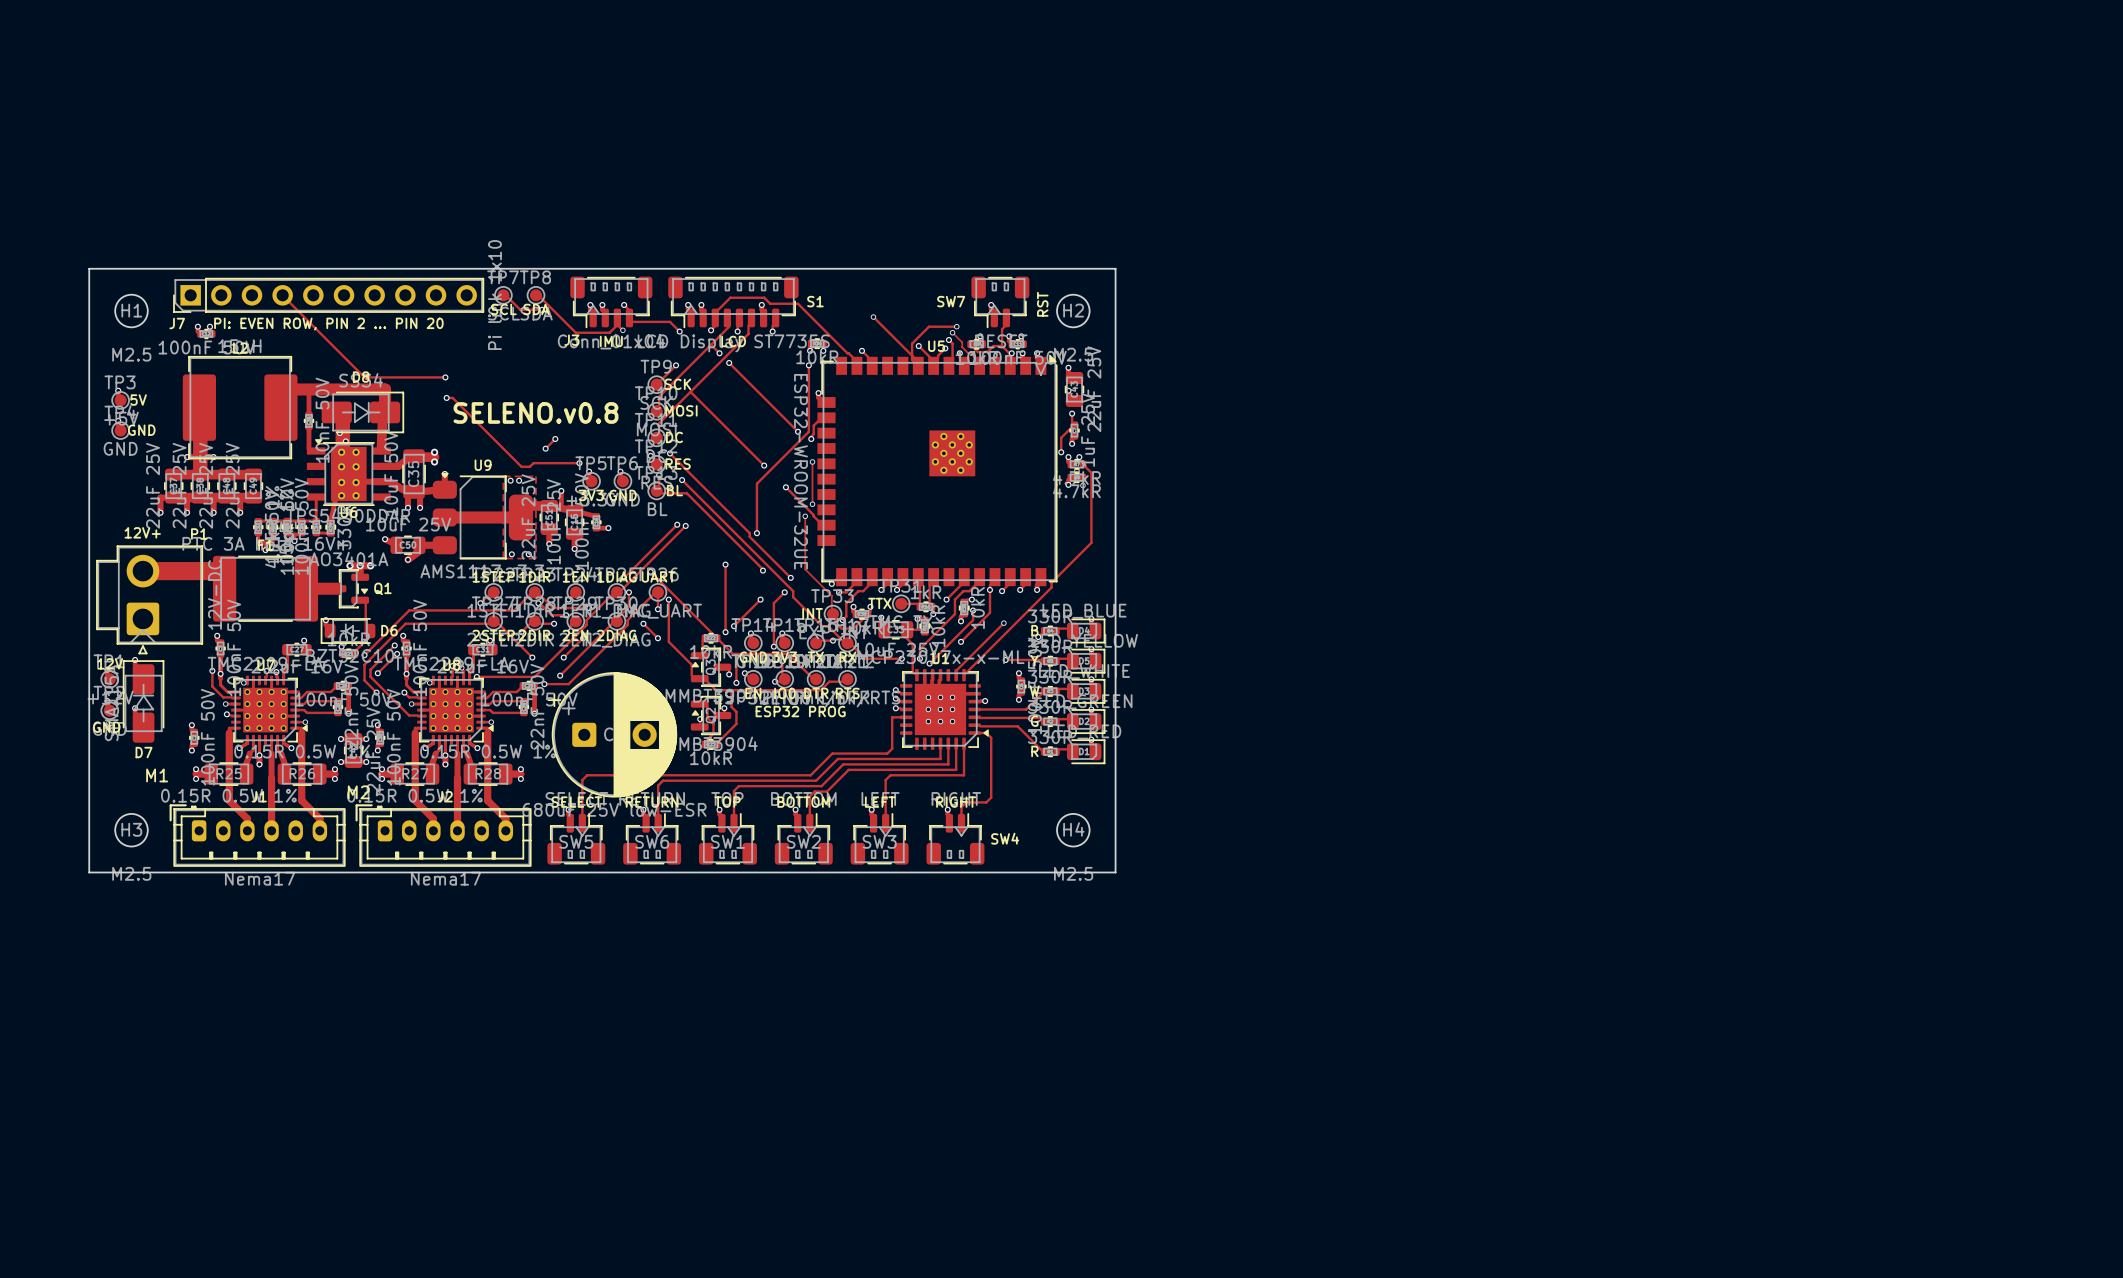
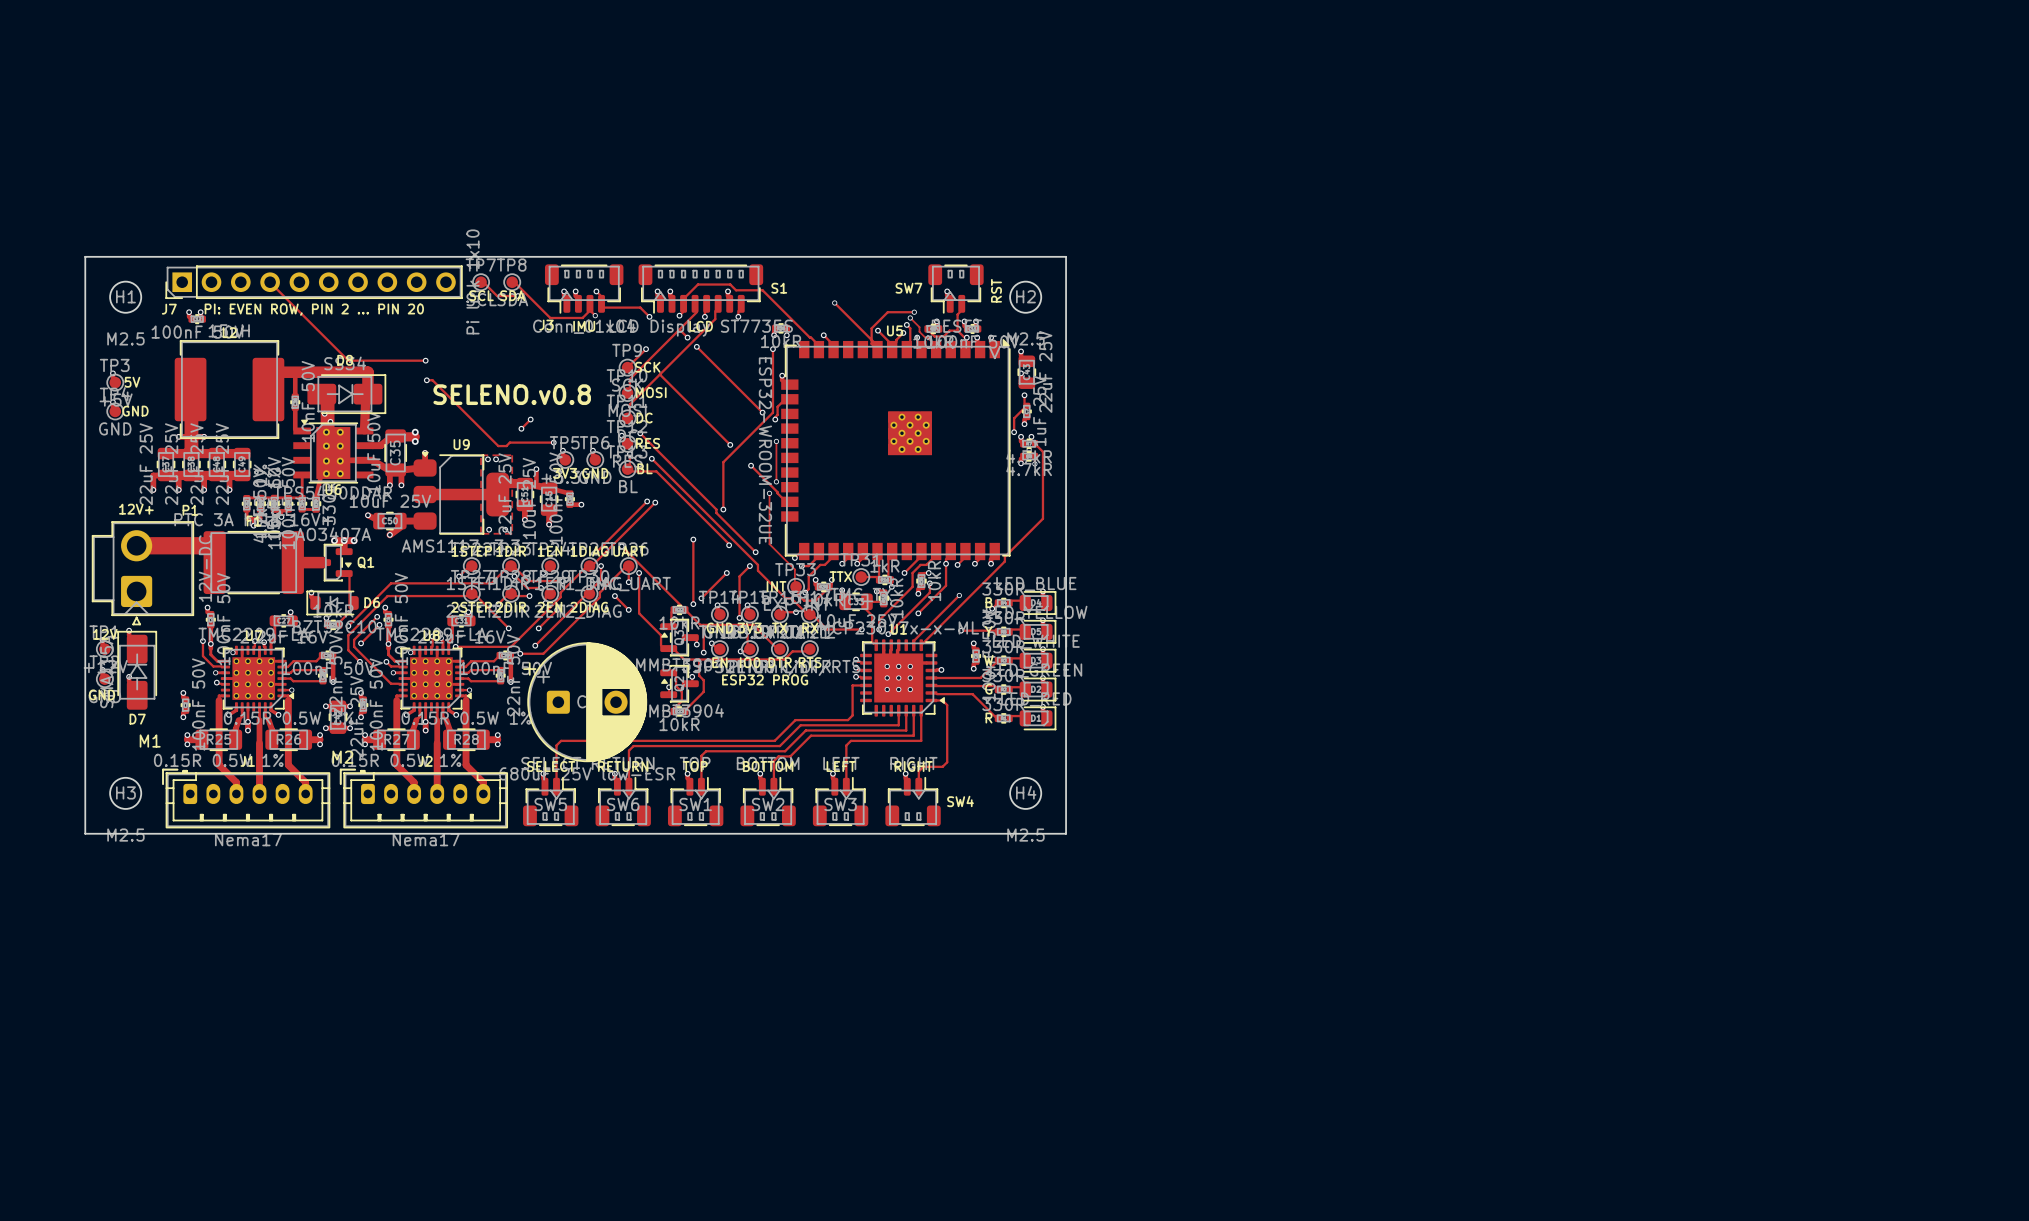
Q1 value: AO3401A (348, 559) -> AO3407A (333, 534)

